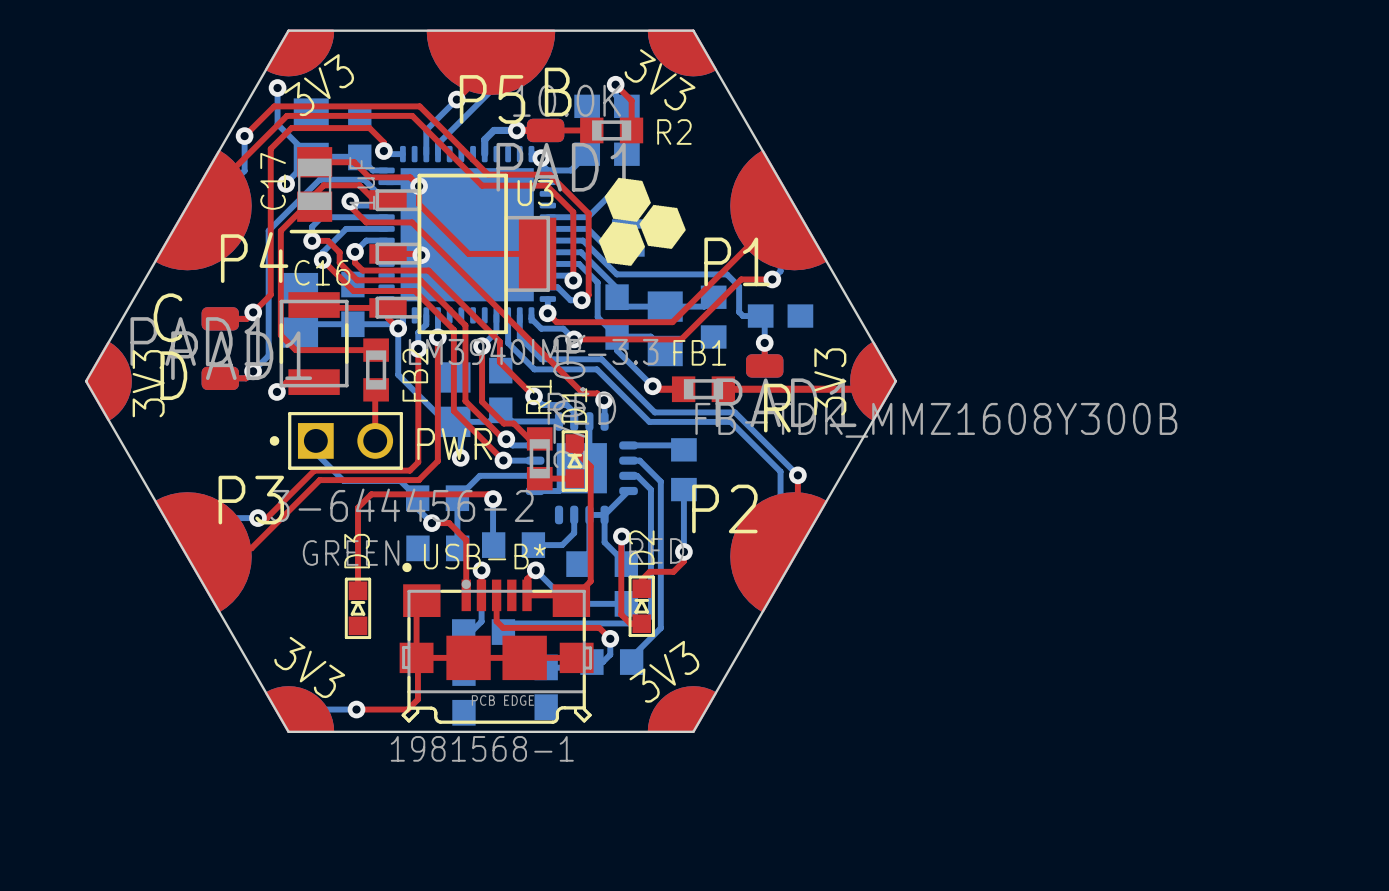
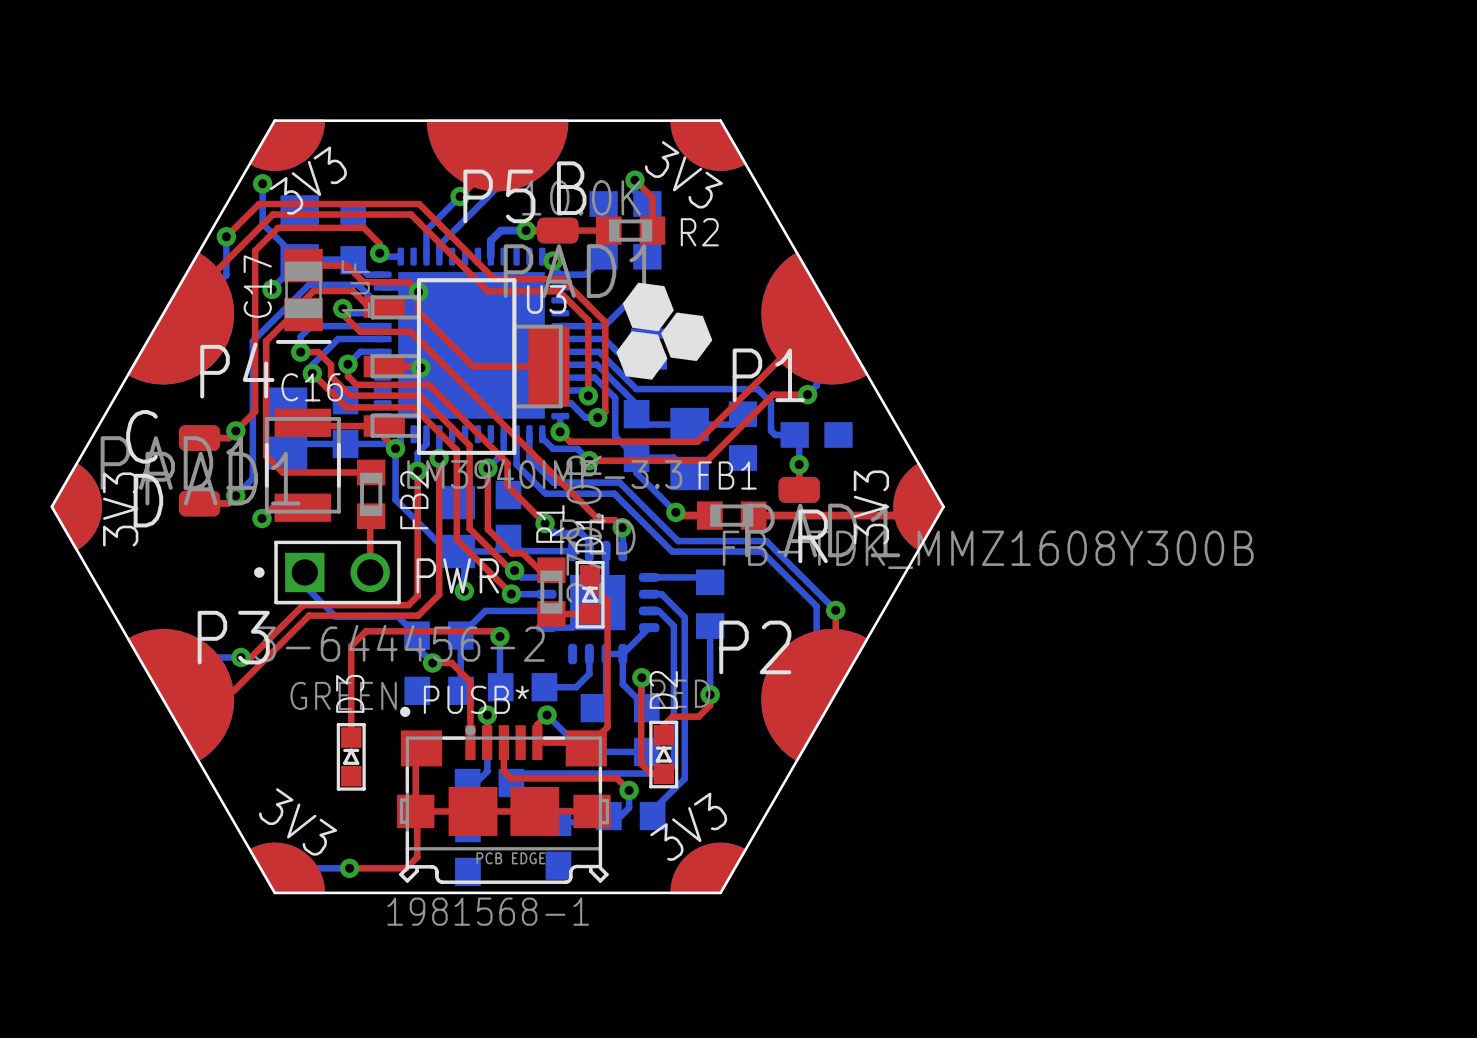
USB-B* name: USB-B* (484, 556) -> PUSB* (476, 699)

